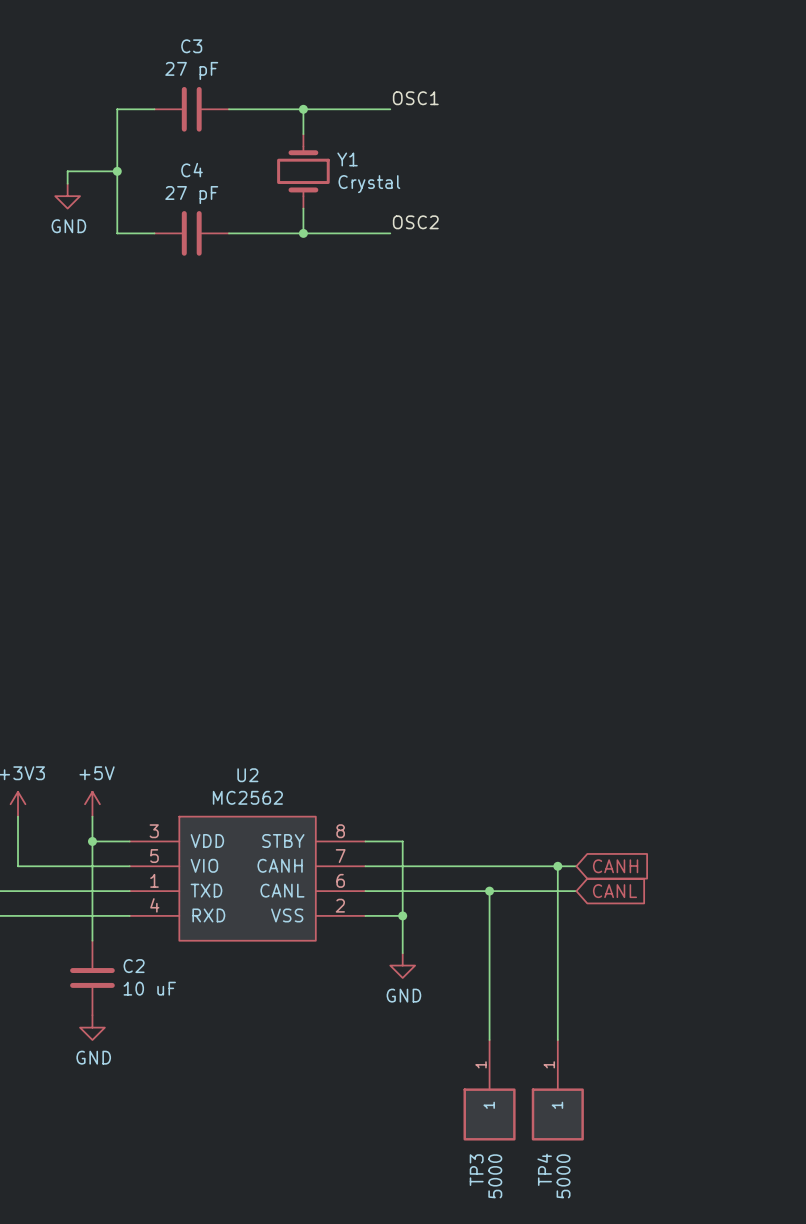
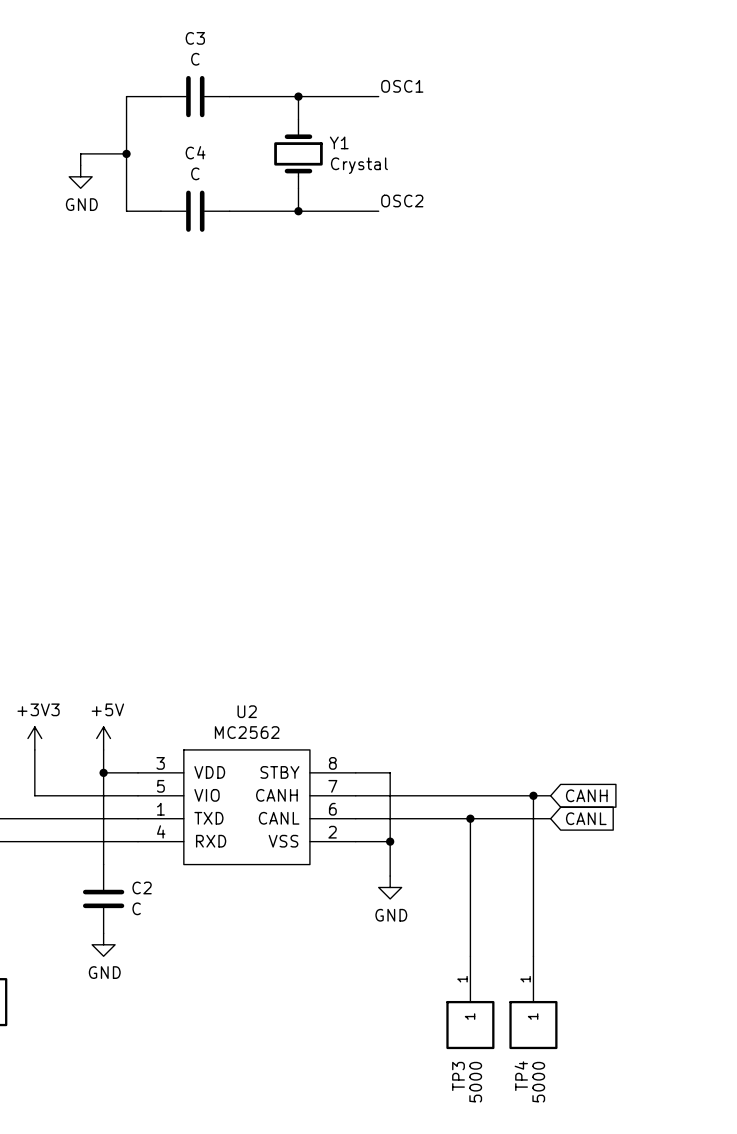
C3 value: 27 pF (191, 70) -> C (195, 59)
C4 value: 27 pF (191, 195) -> C (195, 173)
C2 value: 10 uF (149, 988) -> C (136, 908)

